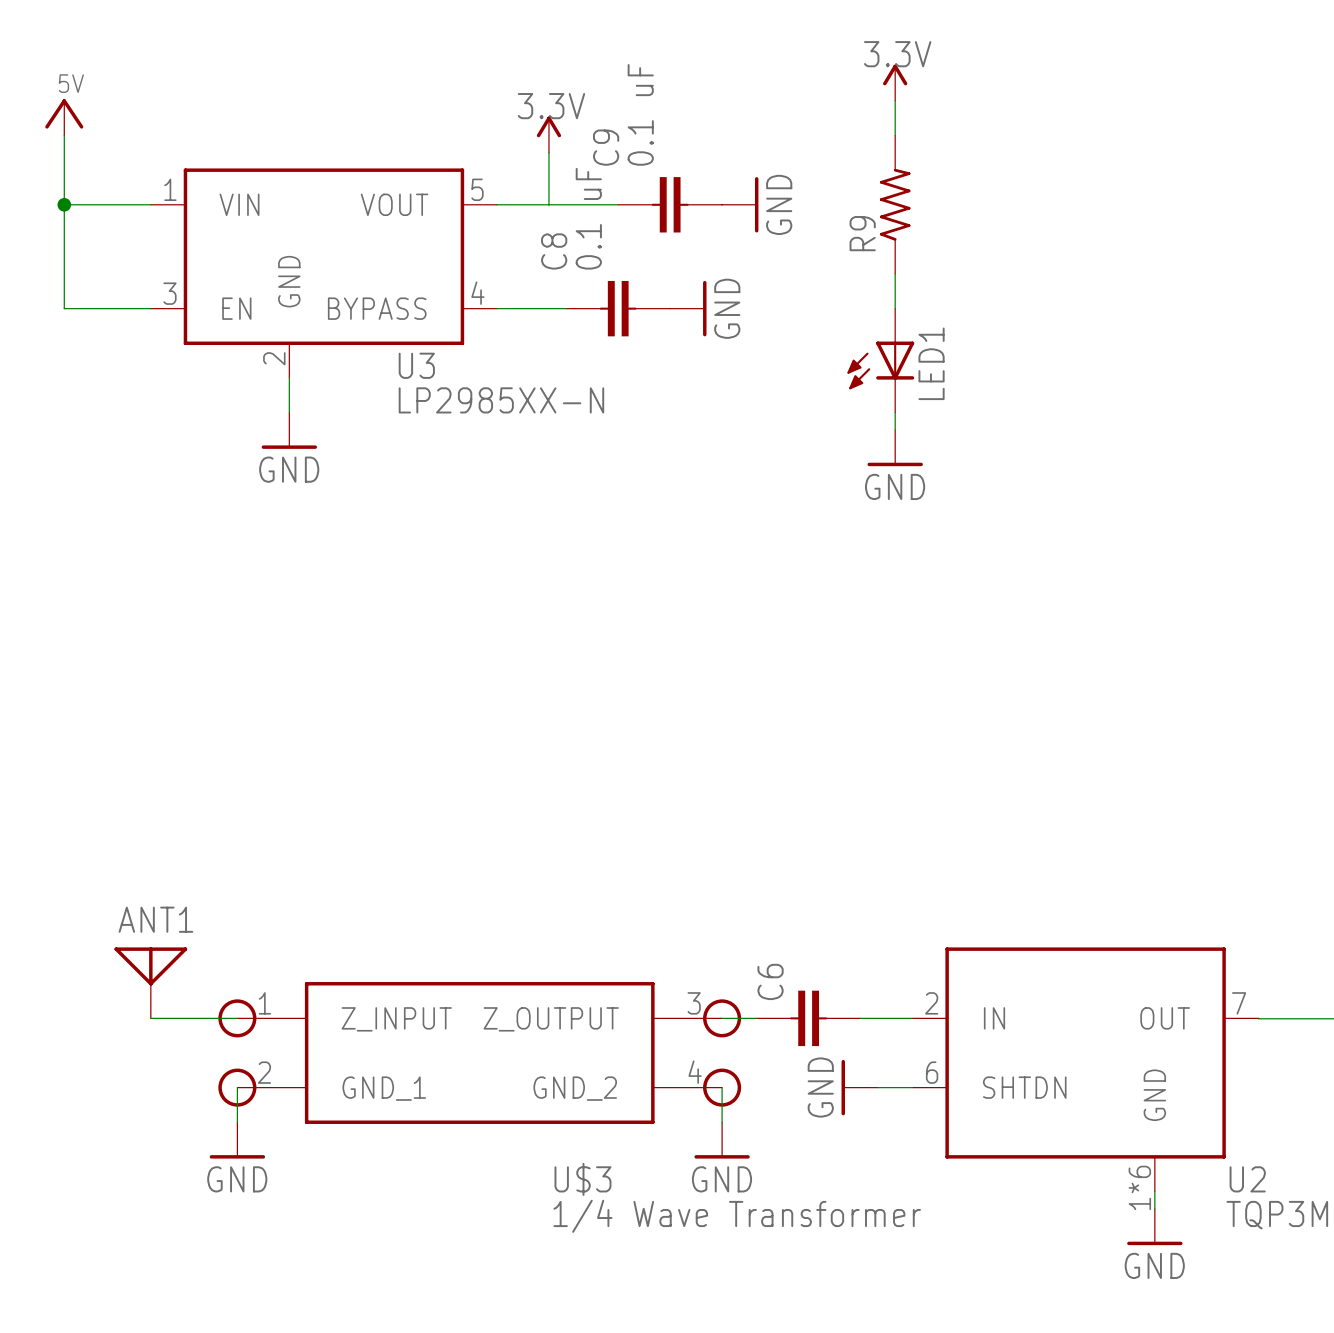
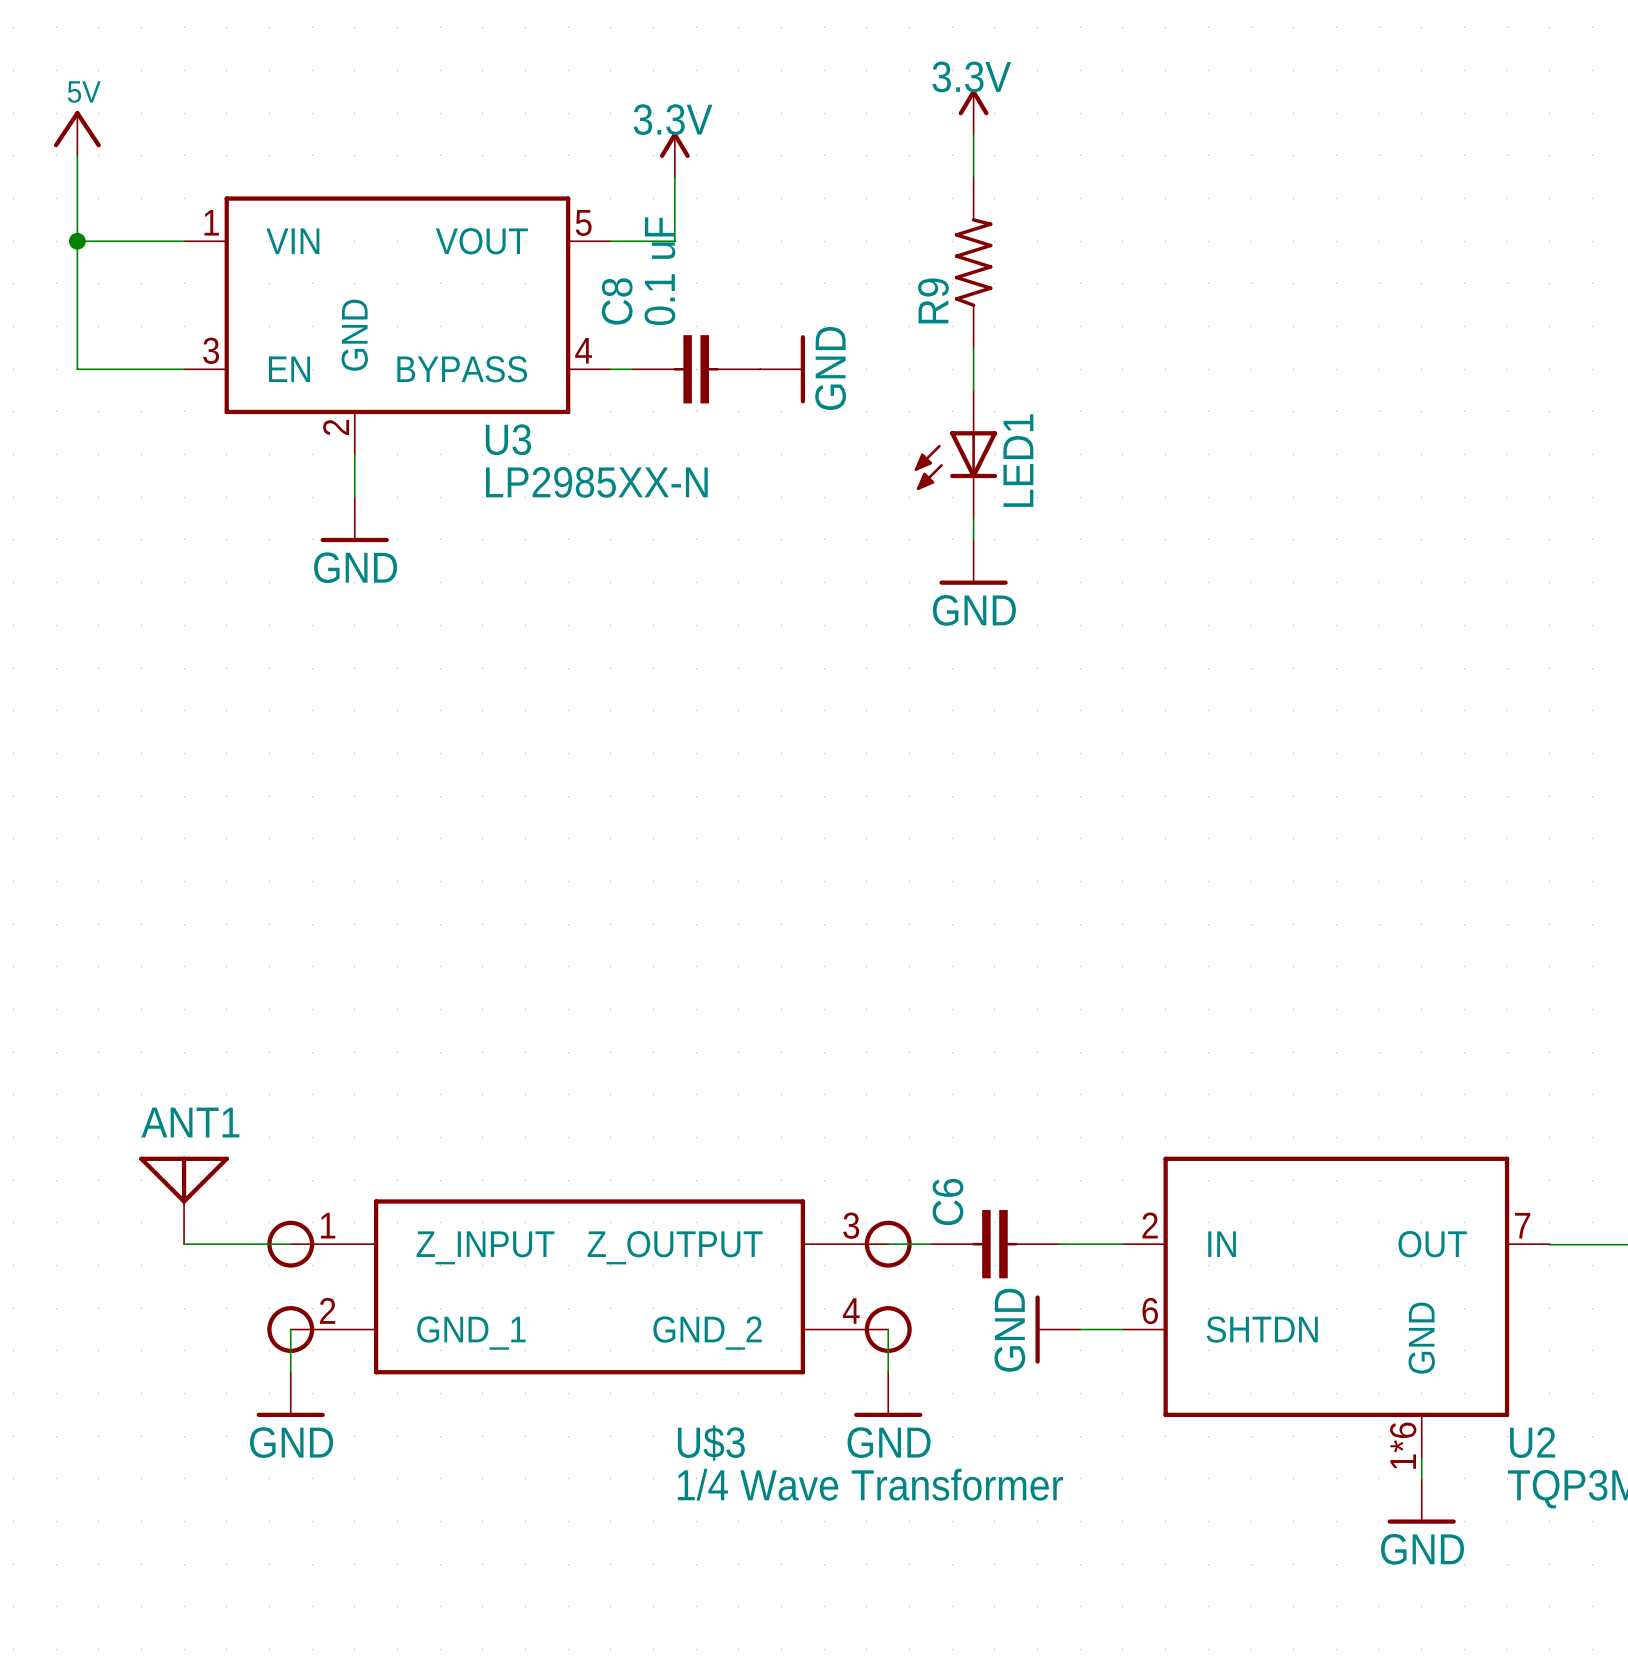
power symbol position: 3.3V (895, 82) -> 3.3V (973, 112)
wire: (895, 100) (895, 135) -> (973, 134) (973, 177)
wire: (548, 204) (618, 204) -> none
C9: 0.1 uF (670, 204) -> none
power symbol: GND (740, 204) -> none
R9 position: (895, 204) -> (973, 262)
wire: (895, 274) (895, 308) -> (973, 347) (973, 390)
C8 position: (618, 308) -> (696, 369)
power symbol position: GND (688, 308) -> GND (782, 369)
LED1 position: (880, 360) -> (955, 454)
wire: (895, 412) (895, 429) -> (973, 518) (973, 539)
power symbol: GND (895, 448) -> none
power symbol: none -> GND (973, 562)

